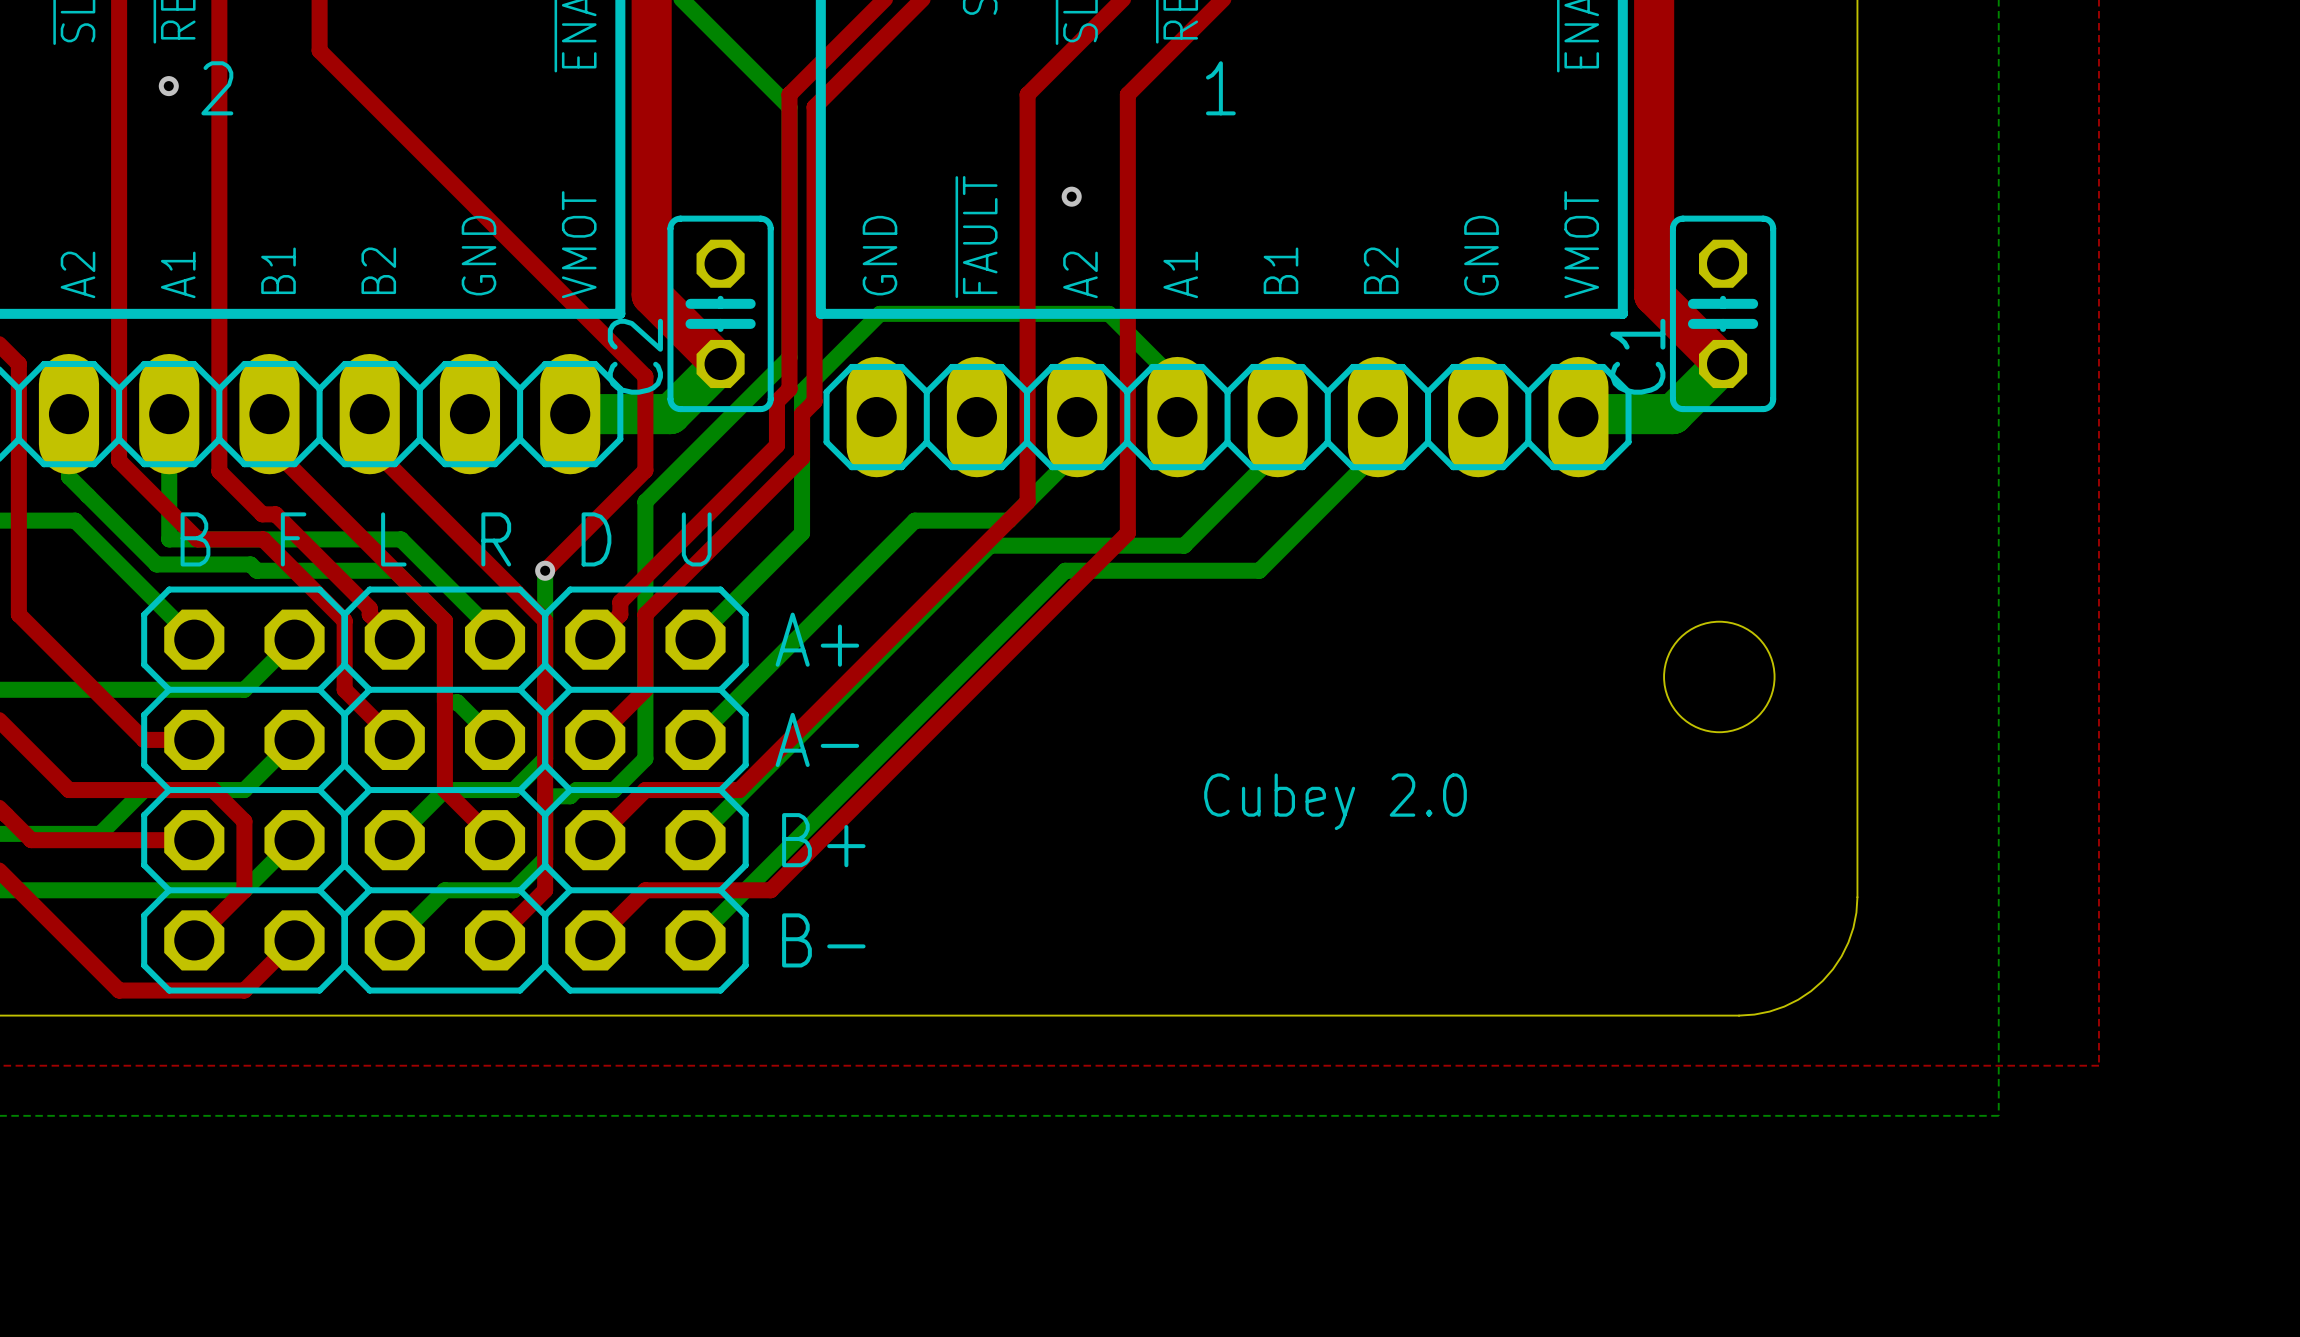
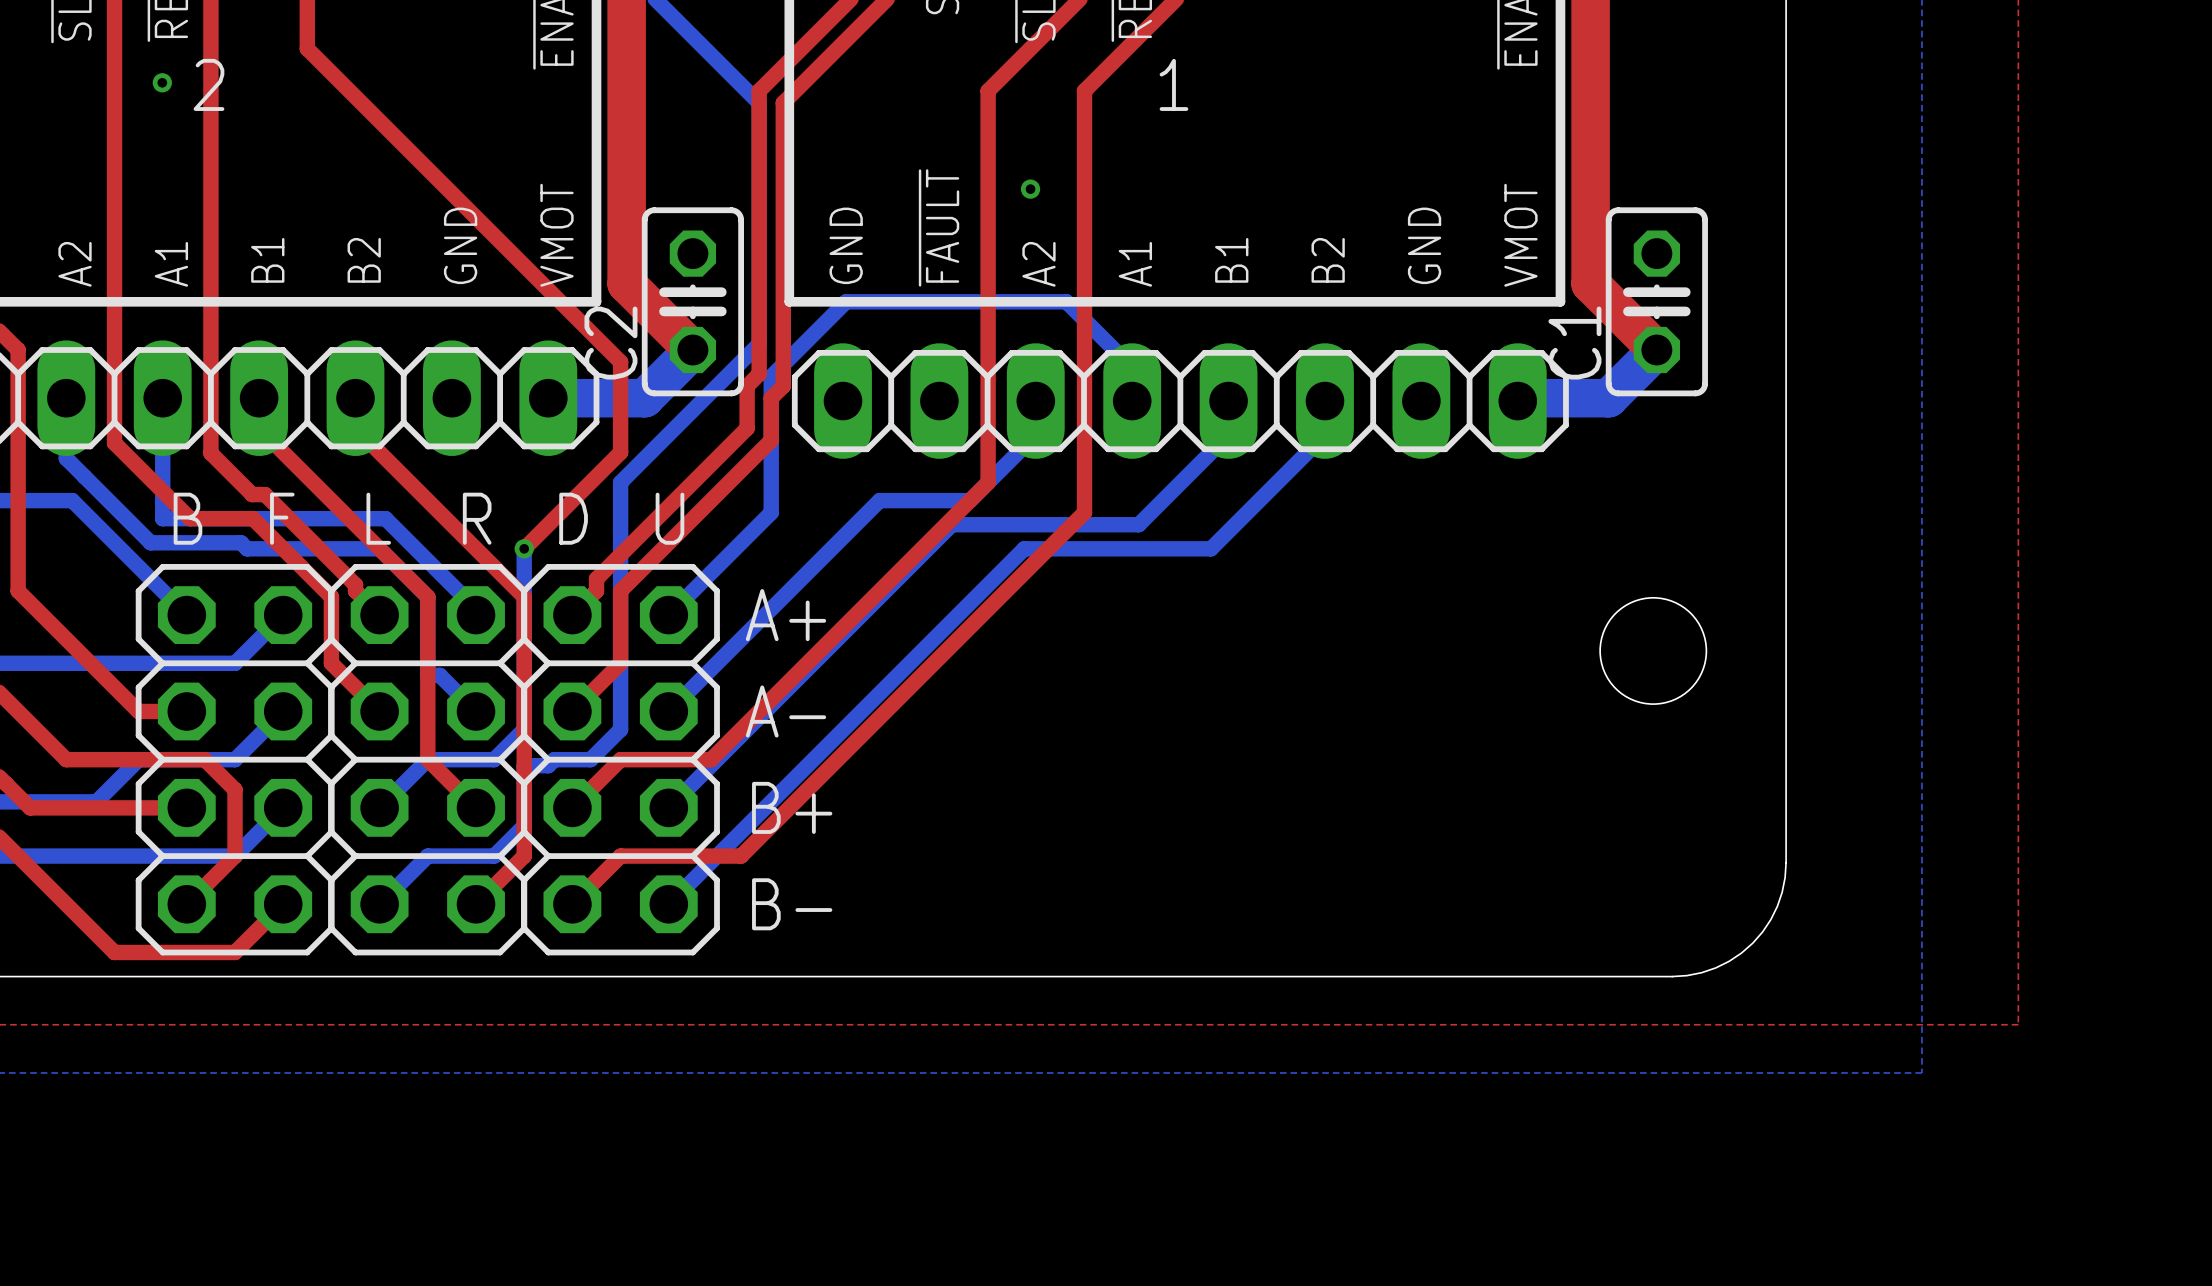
text: Cubey 2.0 (1335, 801) -> none

